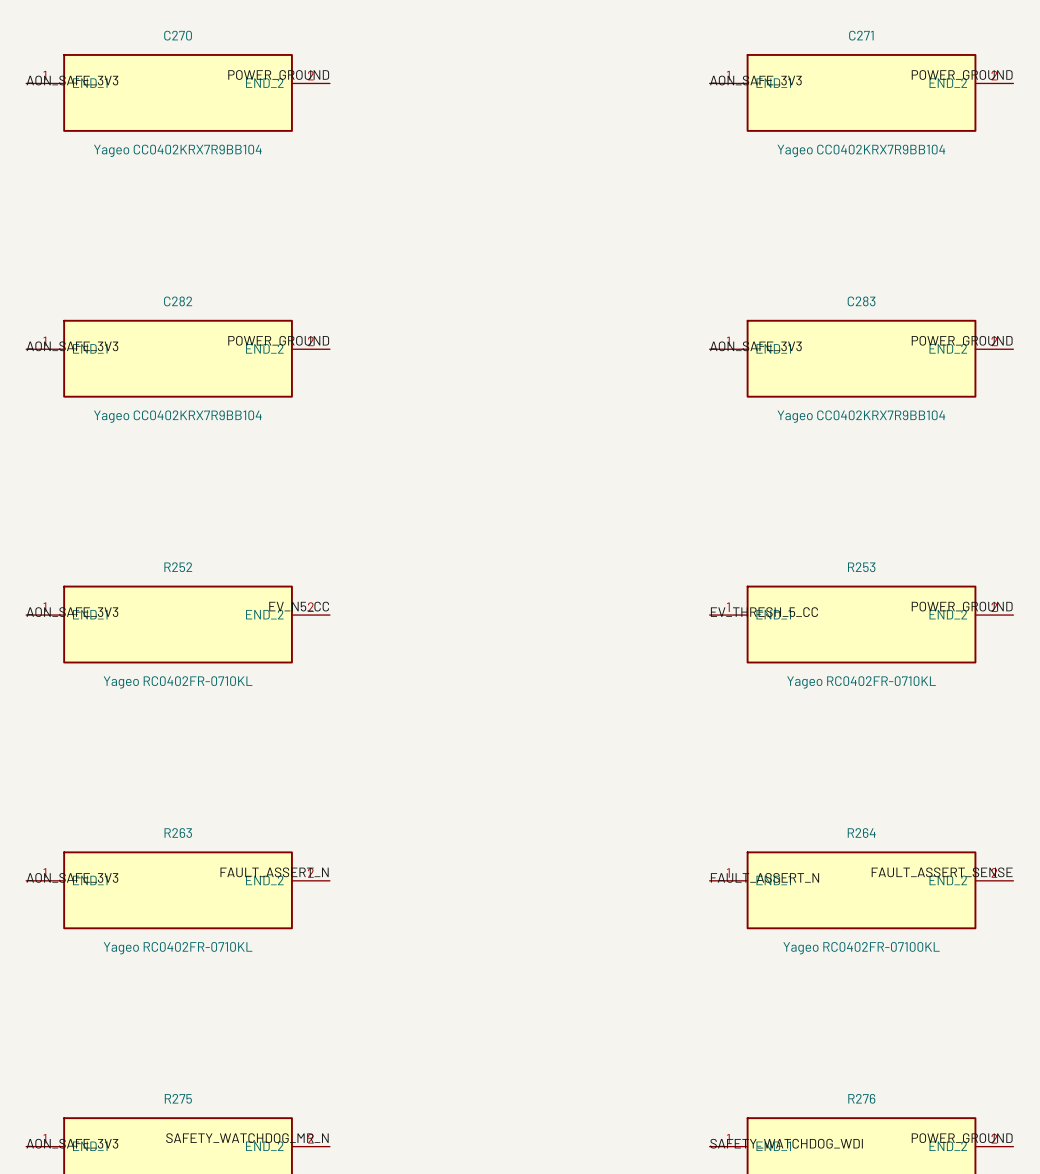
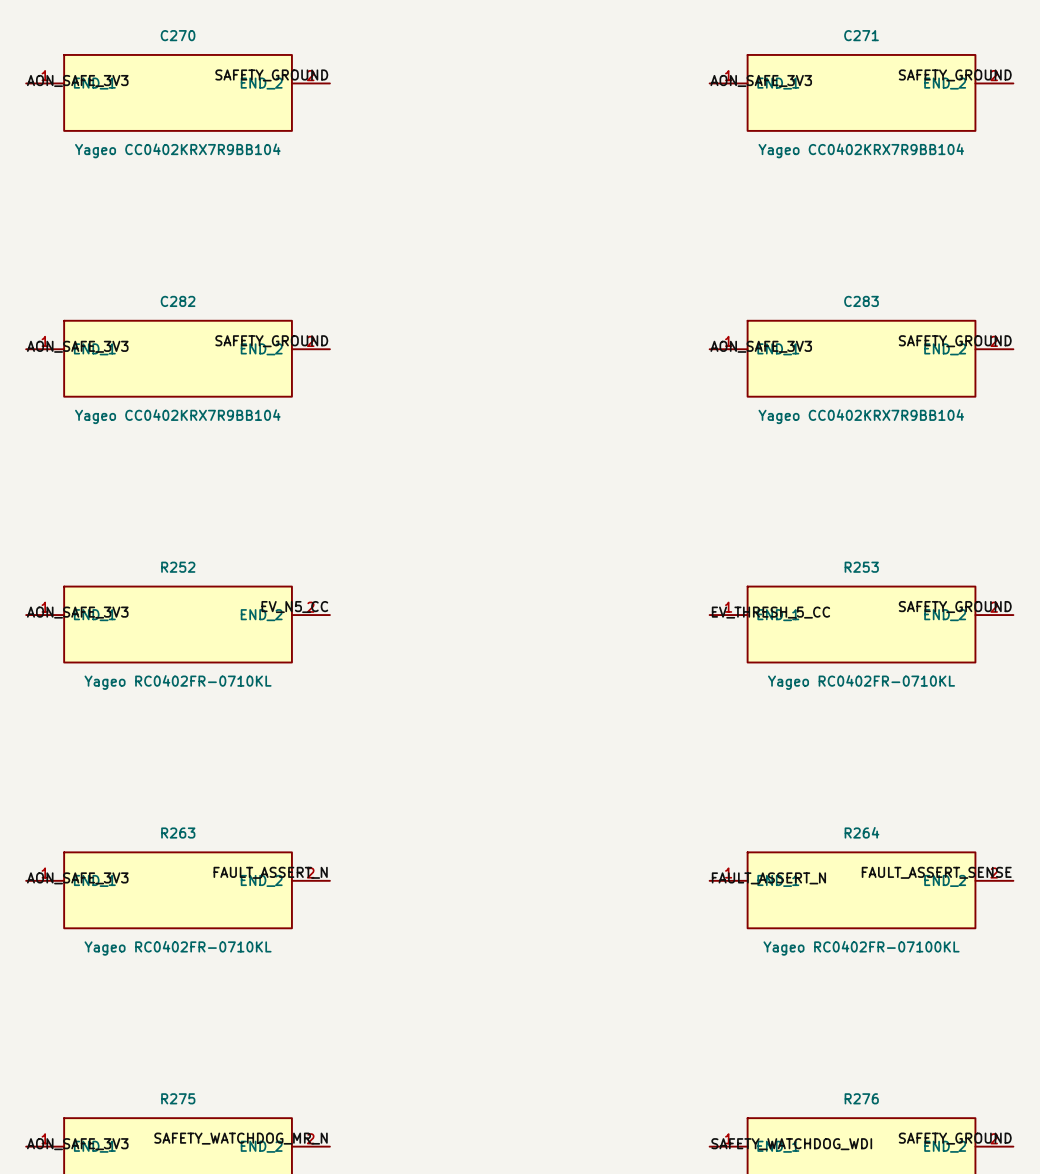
label: POWER_GROUND (278, 74) -> SAFETY_GROUND (271, 75)
label: POWER_GROUND (962, 74) -> SAFETY_GROUND (955, 75)
label: POWER_GROUND (278, 340) -> SAFETY_GROUND (271, 341)
label: POWER_GROUND (962, 340) -> SAFETY_GROUND (955, 341)
label: POWER_GROUND (962, 606) -> SAFETY_GROUND (955, 607)
label: POWER_GROUND (962, 1138) -> SAFETY_GROUND (955, 1138)

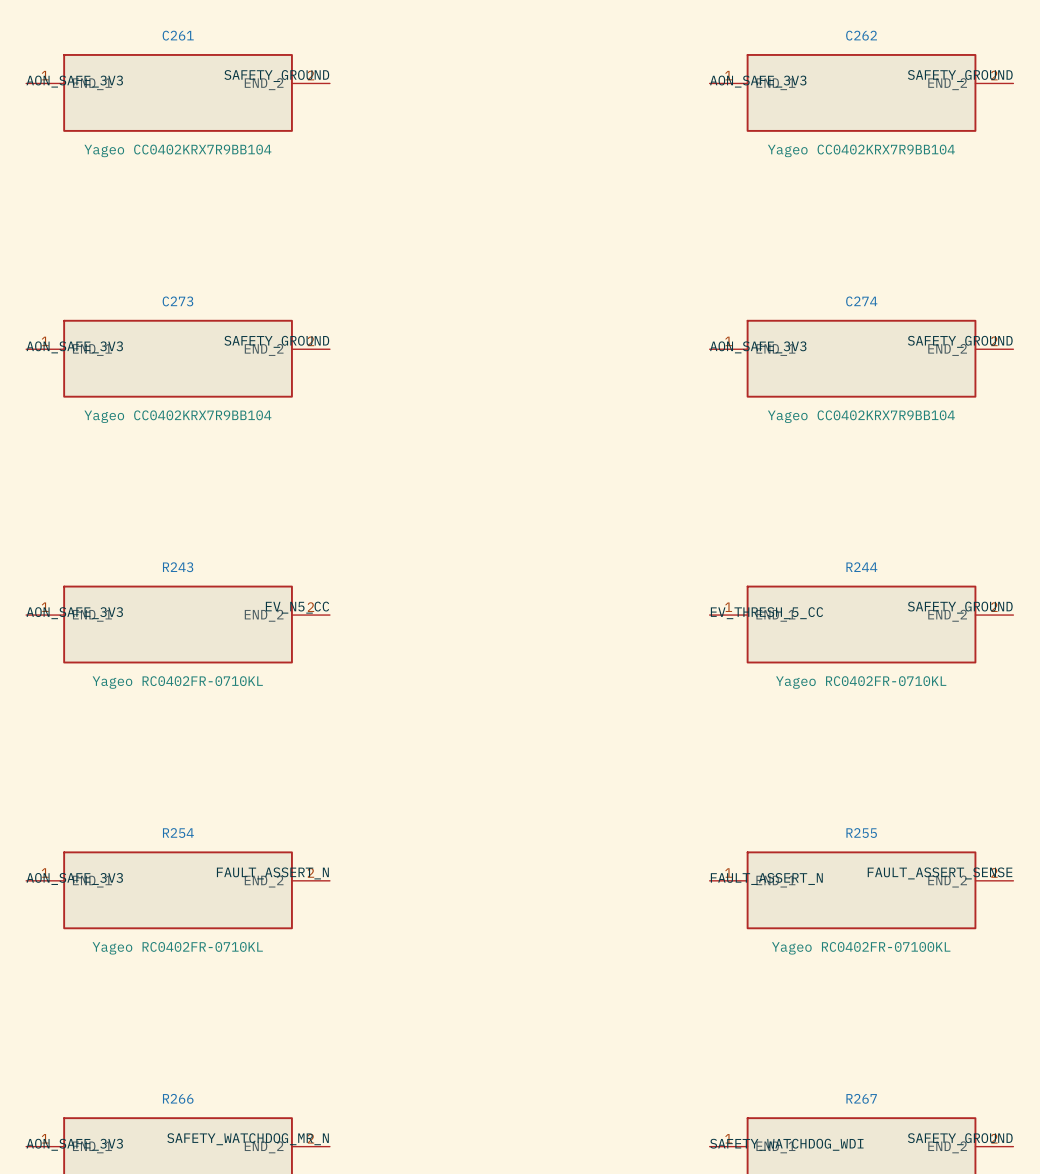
C270 name: C270 (178, 35) -> C261 (178, 35)
C271 name: C271 (861, 35) -> C262 (861, 35)
C282 name: C282 (178, 301) -> C273 (177, 301)
C283 name: C283 (861, 301) -> C274 (861, 301)
R252 name: R252 (178, 567) -> R243 (178, 567)
R253 name: R253 (861, 567) -> R244 (861, 567)
R264 name: R264 (861, 832) -> R255 (861, 833)
R263 name: R263 (178, 833) -> R254 (178, 833)
R275 name: R275 (178, 1098) -> R266 (178, 1098)
R276 name: R276 (861, 1098) -> R267 (861, 1098)

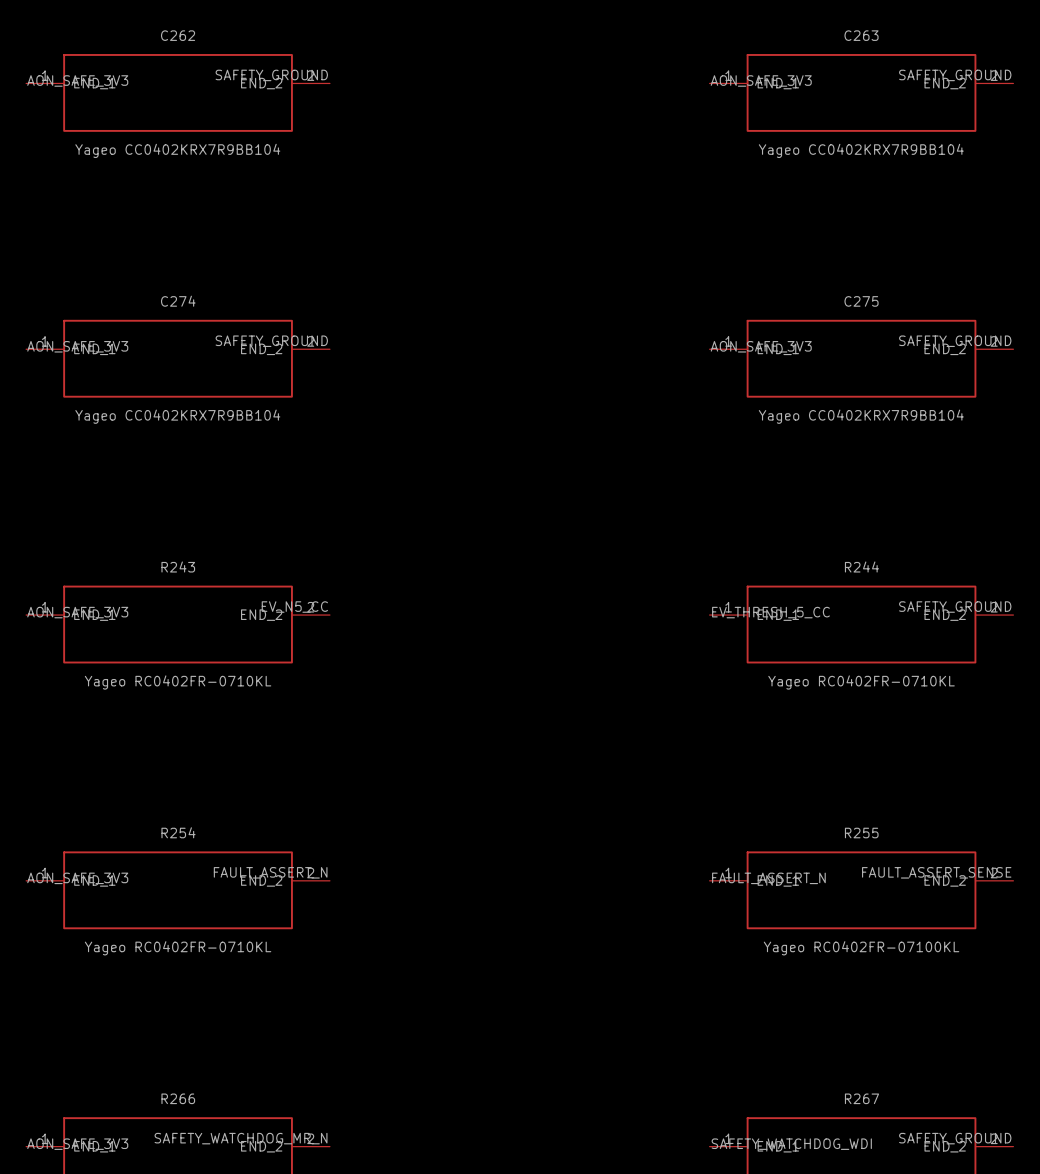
C261 name: C261 (178, 35) -> C262 (178, 35)
C262 name: C262 (861, 35) -> C263 (861, 35)
C273 name: C273 (177, 301) -> C274 (178, 301)
C274 name: C274 (861, 301) -> C275 (861, 301)

